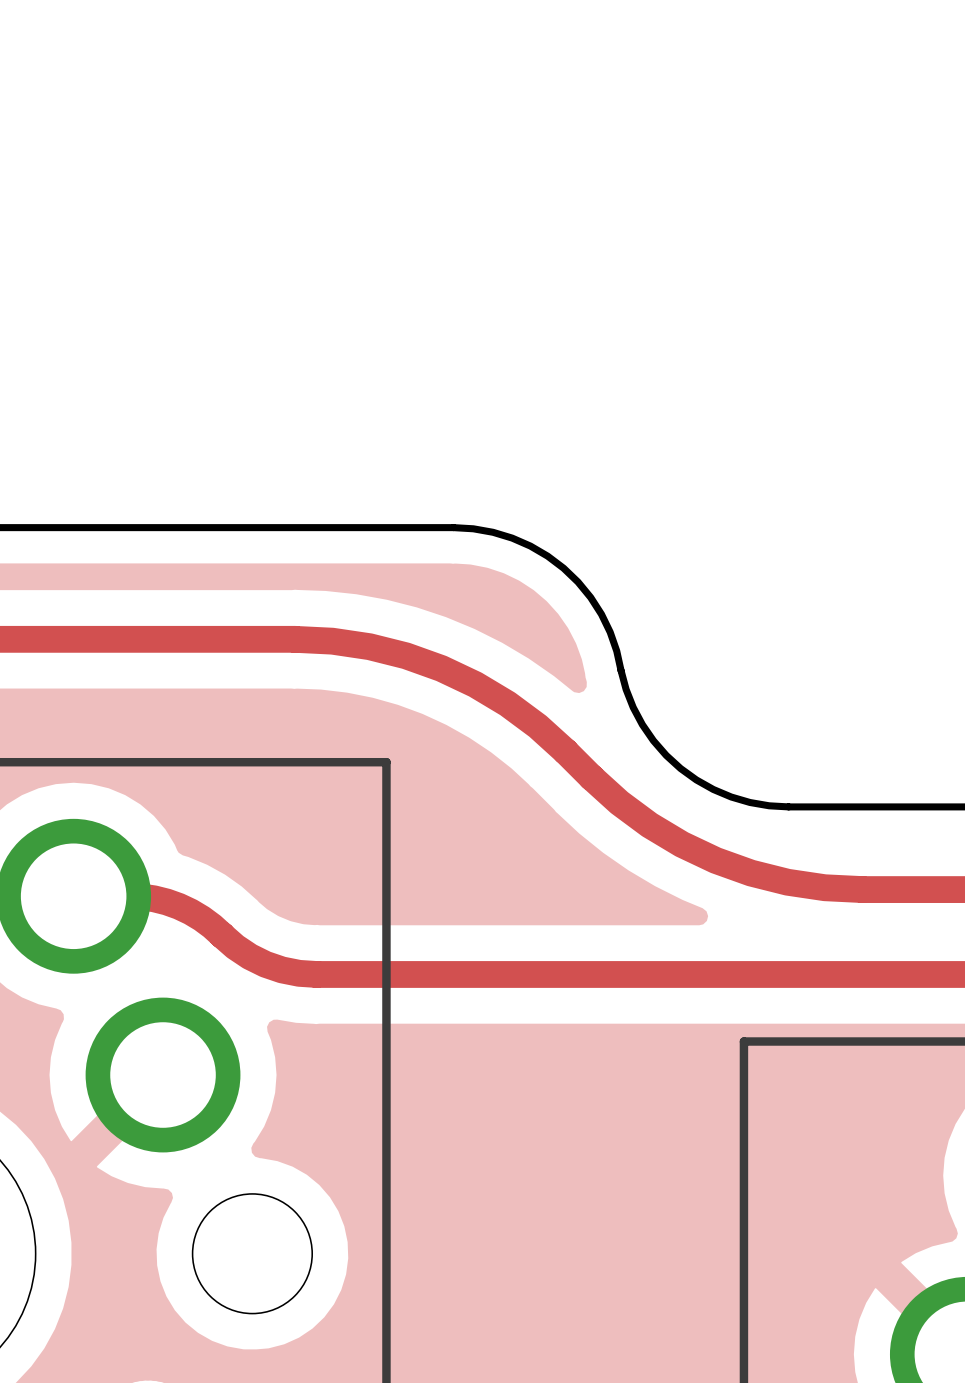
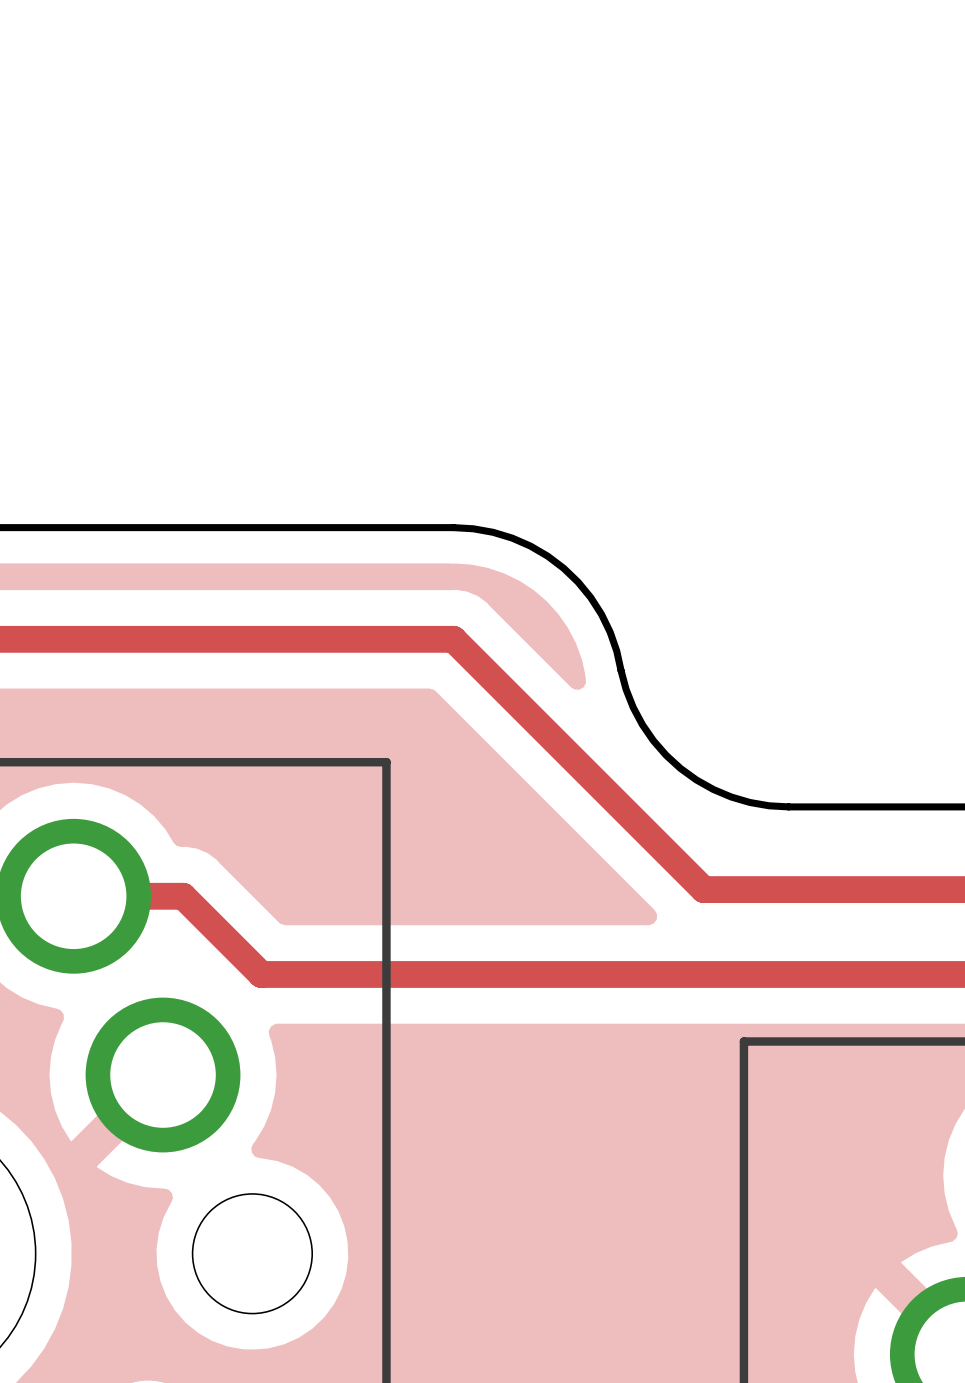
track: (294, 639) (332, 641) (369, 646) (406, 655) (441, 668) (475, 684) (507, 703) (537, 726) (565, 751) -> (294, 639) (453, 639) (565, 751)
track: (591, 777) (619, 802) (649, 825) (681, 844) (715, 860) (751, 873) (787, 882) (824, 887) (862, 889) -> (591, 777) (703, 889) (862, 889)
track: (128, 896) (154, 898) (178, 906) (201, 918) (221, 934) -> none
track: (222, 935) (235, 946) (265, 964) (299, 973) (316, 974) -> (128, 896) (183, 896) (261, 974) (316, 974)

